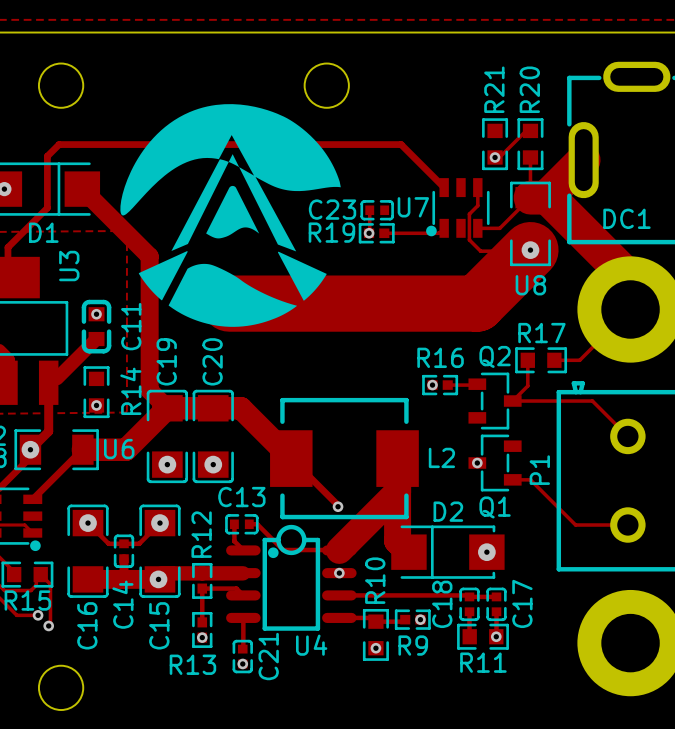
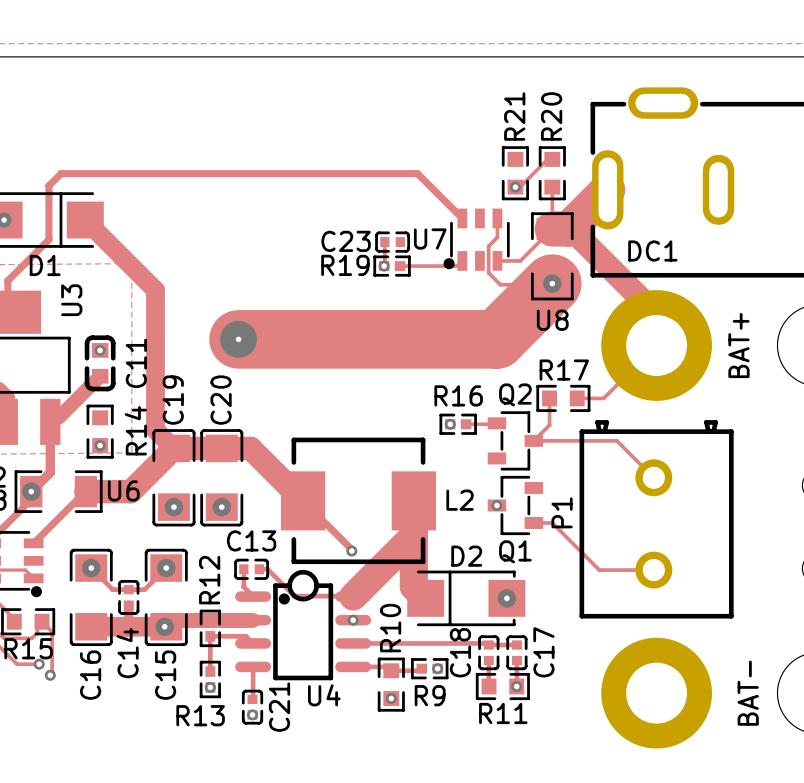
round board edge: [38, 63, 84, 109] -> none
round board edge: [304, 63, 350, 109] -> none
drawing: [120, 104, 341, 327] -> none
track width: thick (548, 197) (630, 279) -> thin (571, 228) (656, 314)
round board edge: [38, 665, 84, 711] -> none

